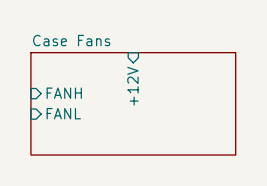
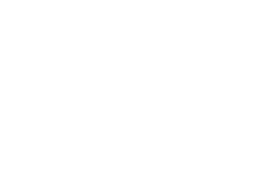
sheet pin: +12V (132, 86) -> none
sheet pin: FANH (64, 93) -> none
sheet Case Fans: (133, 103) -> none
sheet pin: FANL (63, 113) -> none

